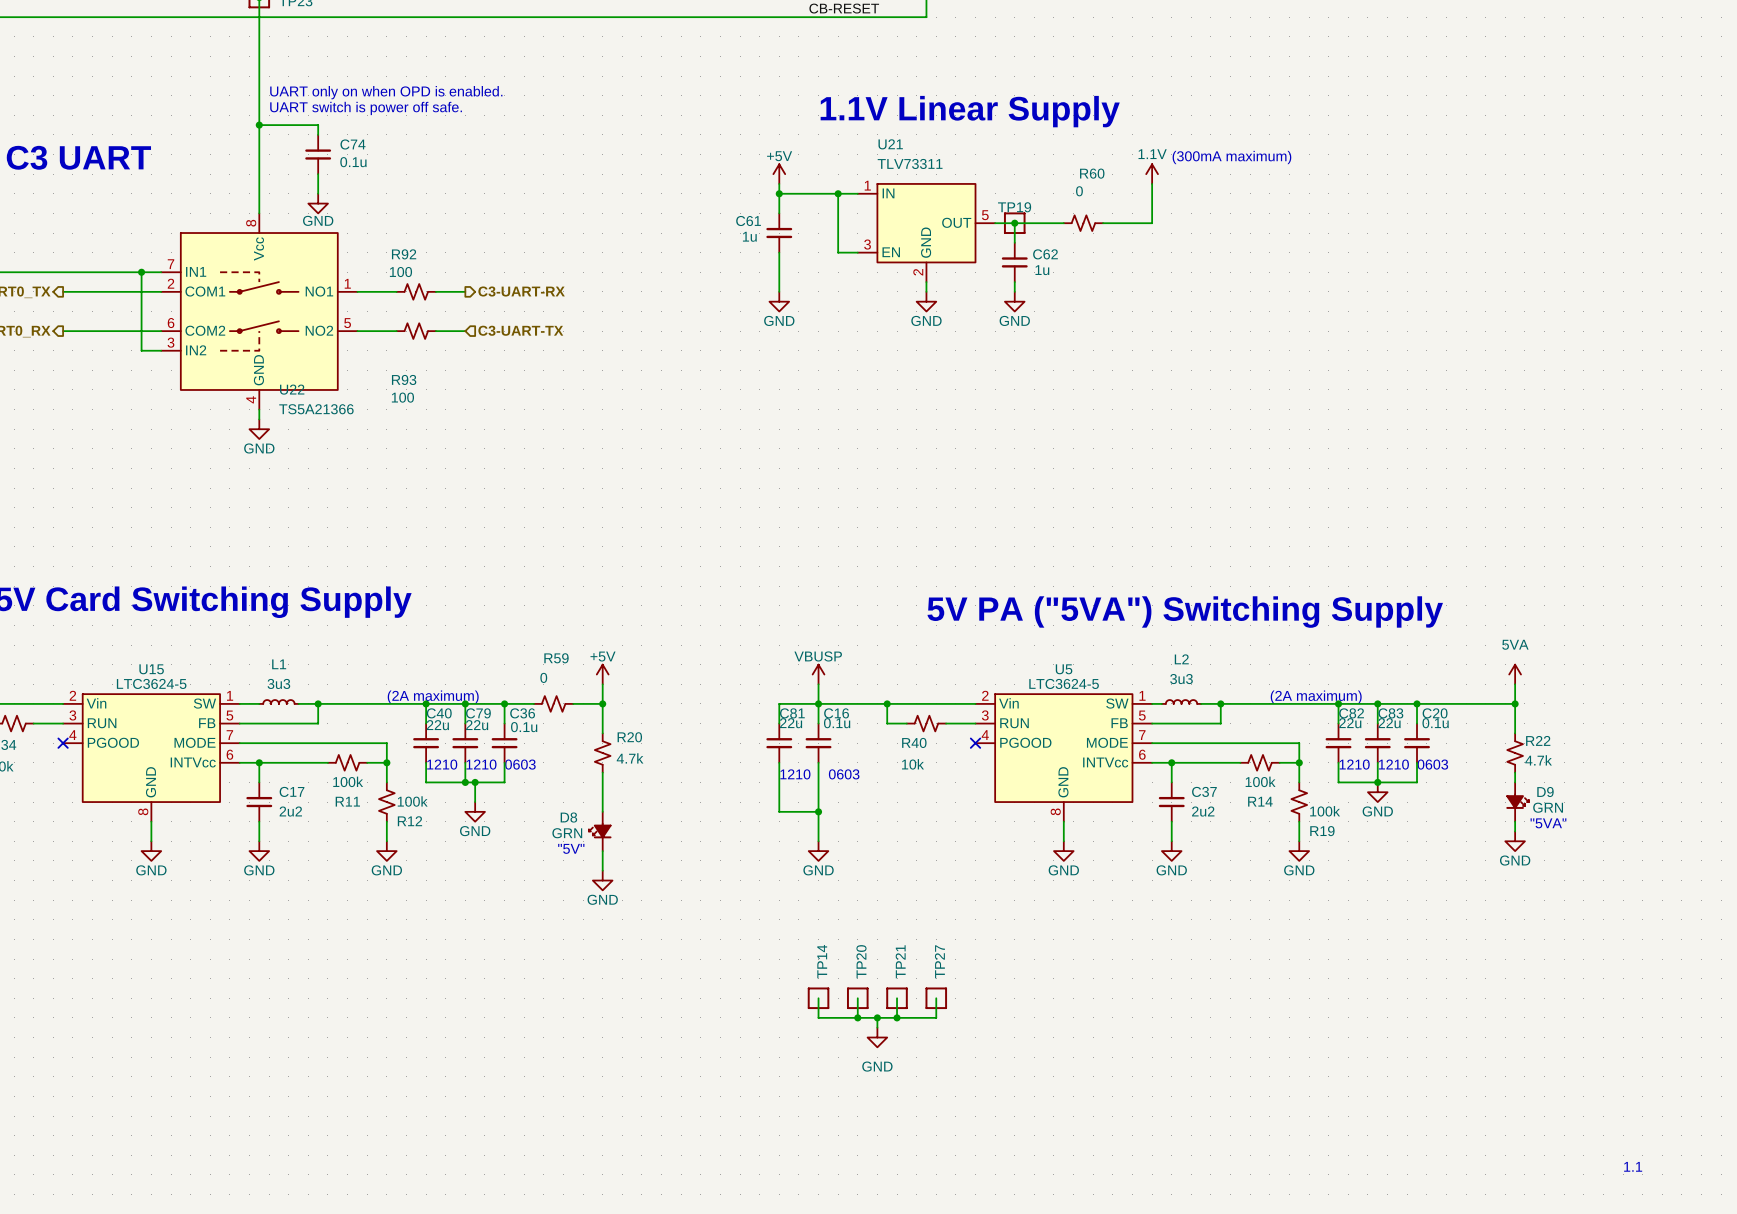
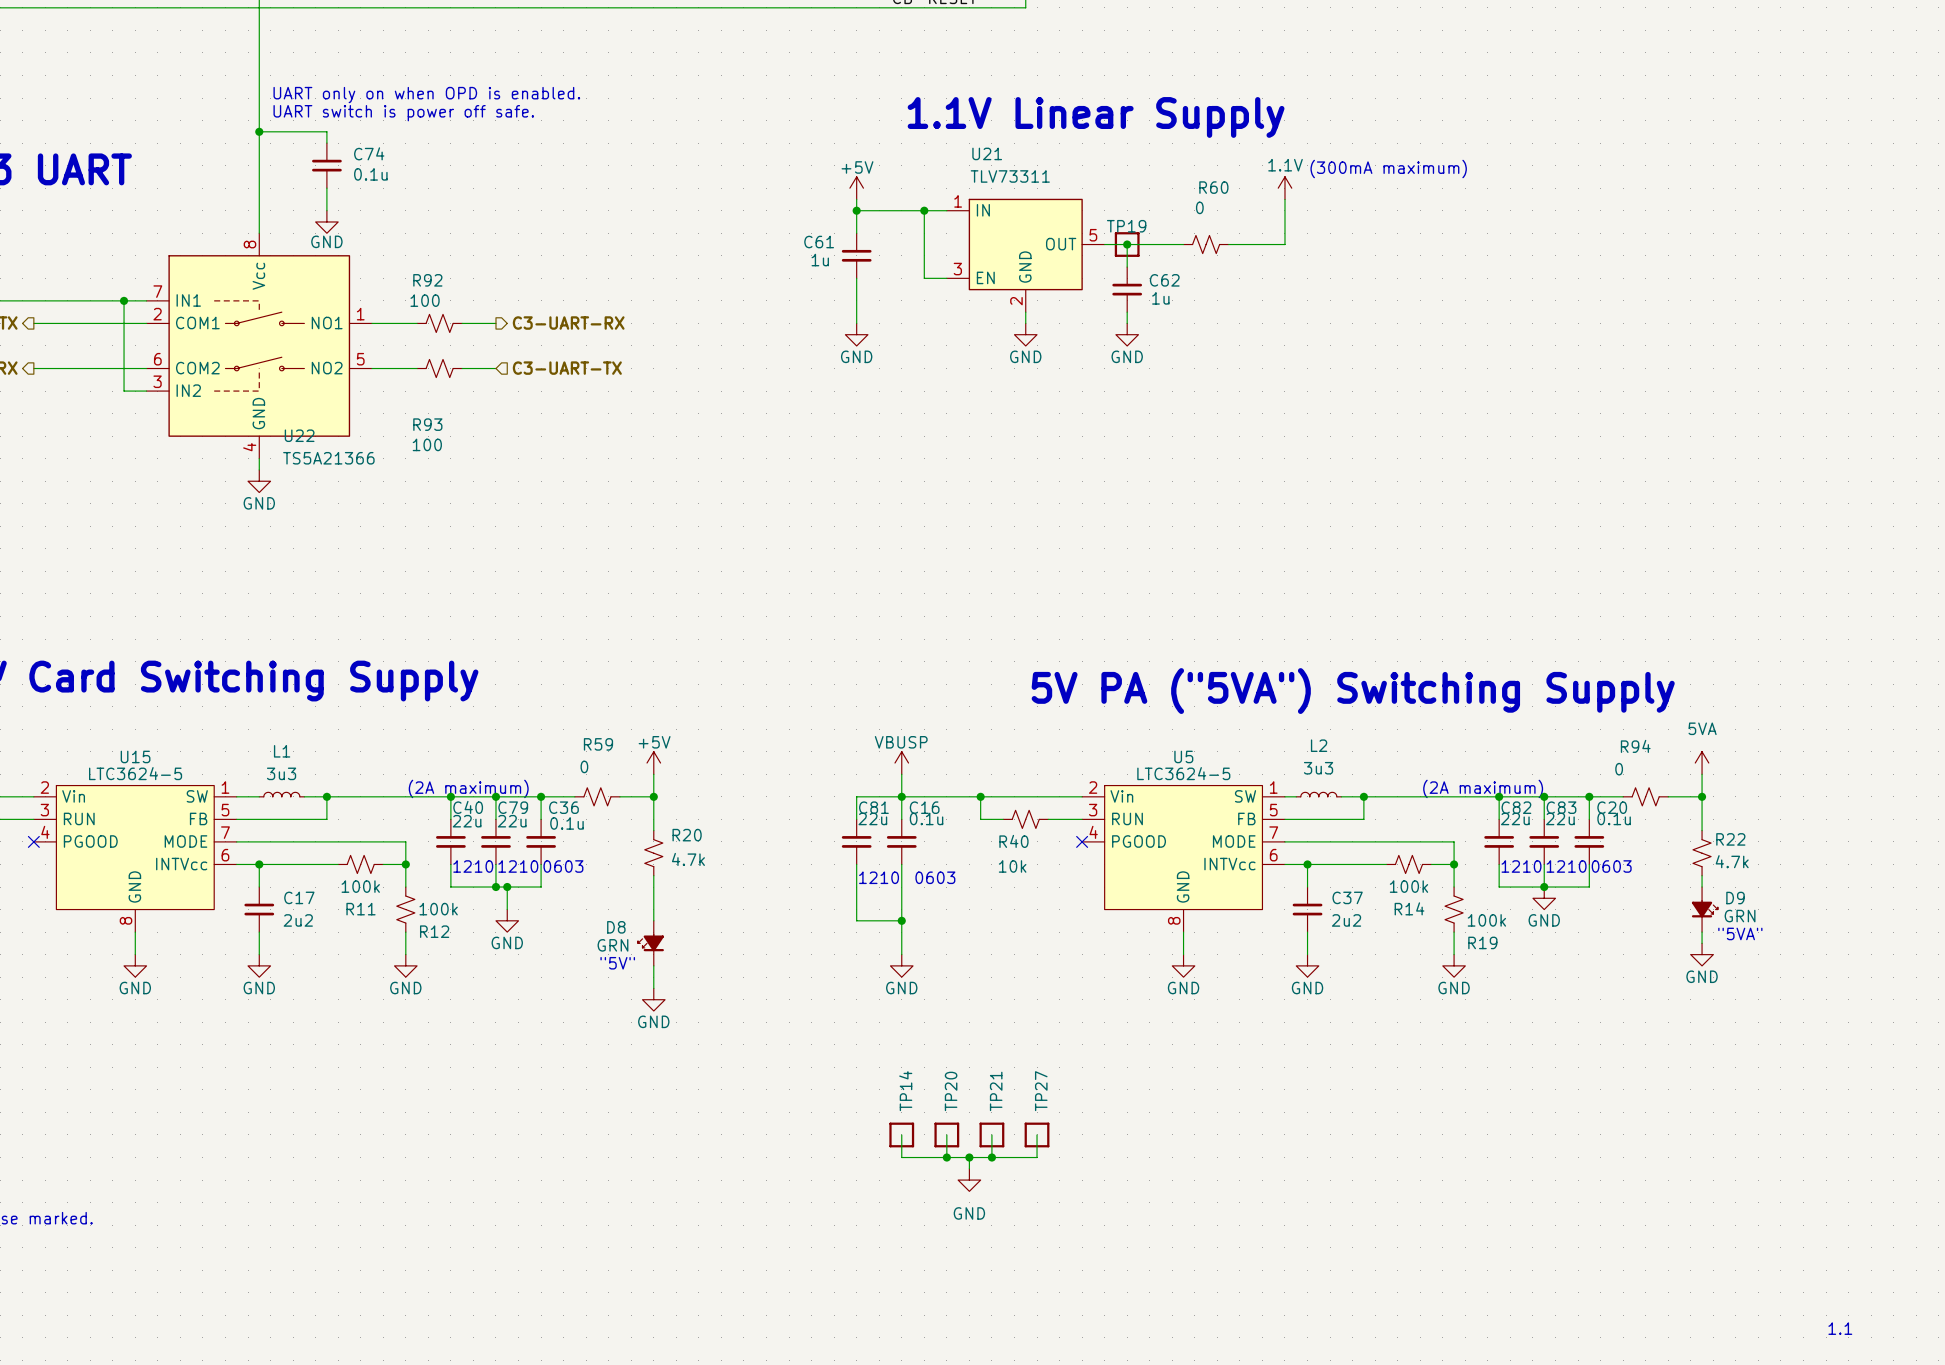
R94: none -> 0 (1645, 796)

